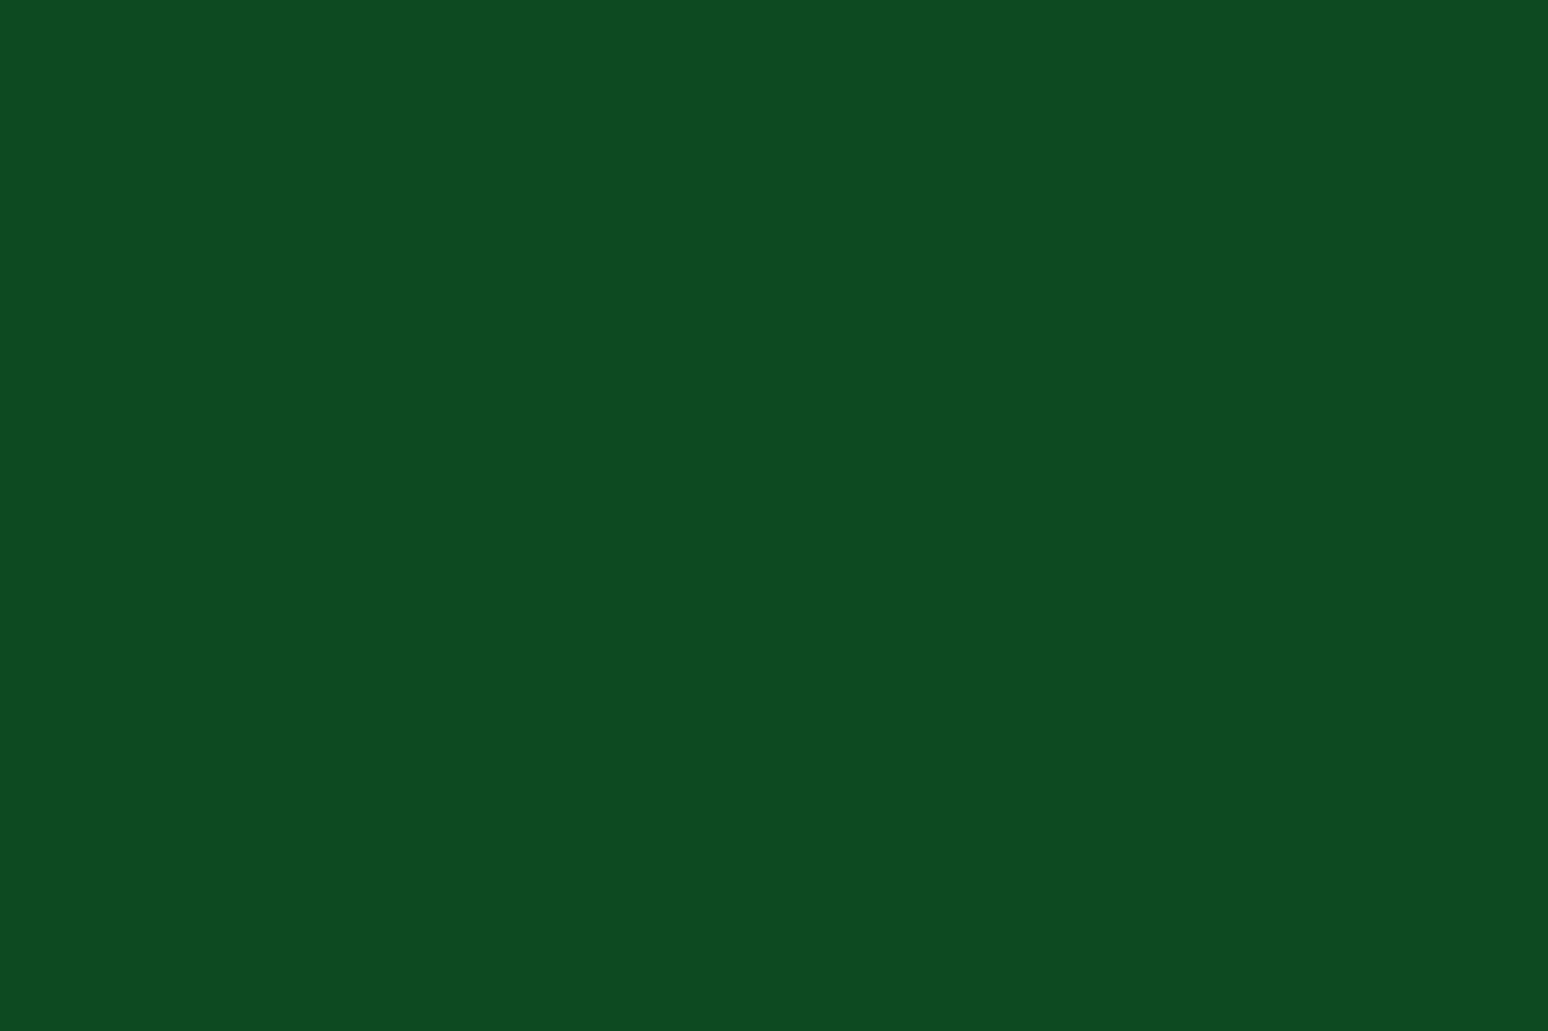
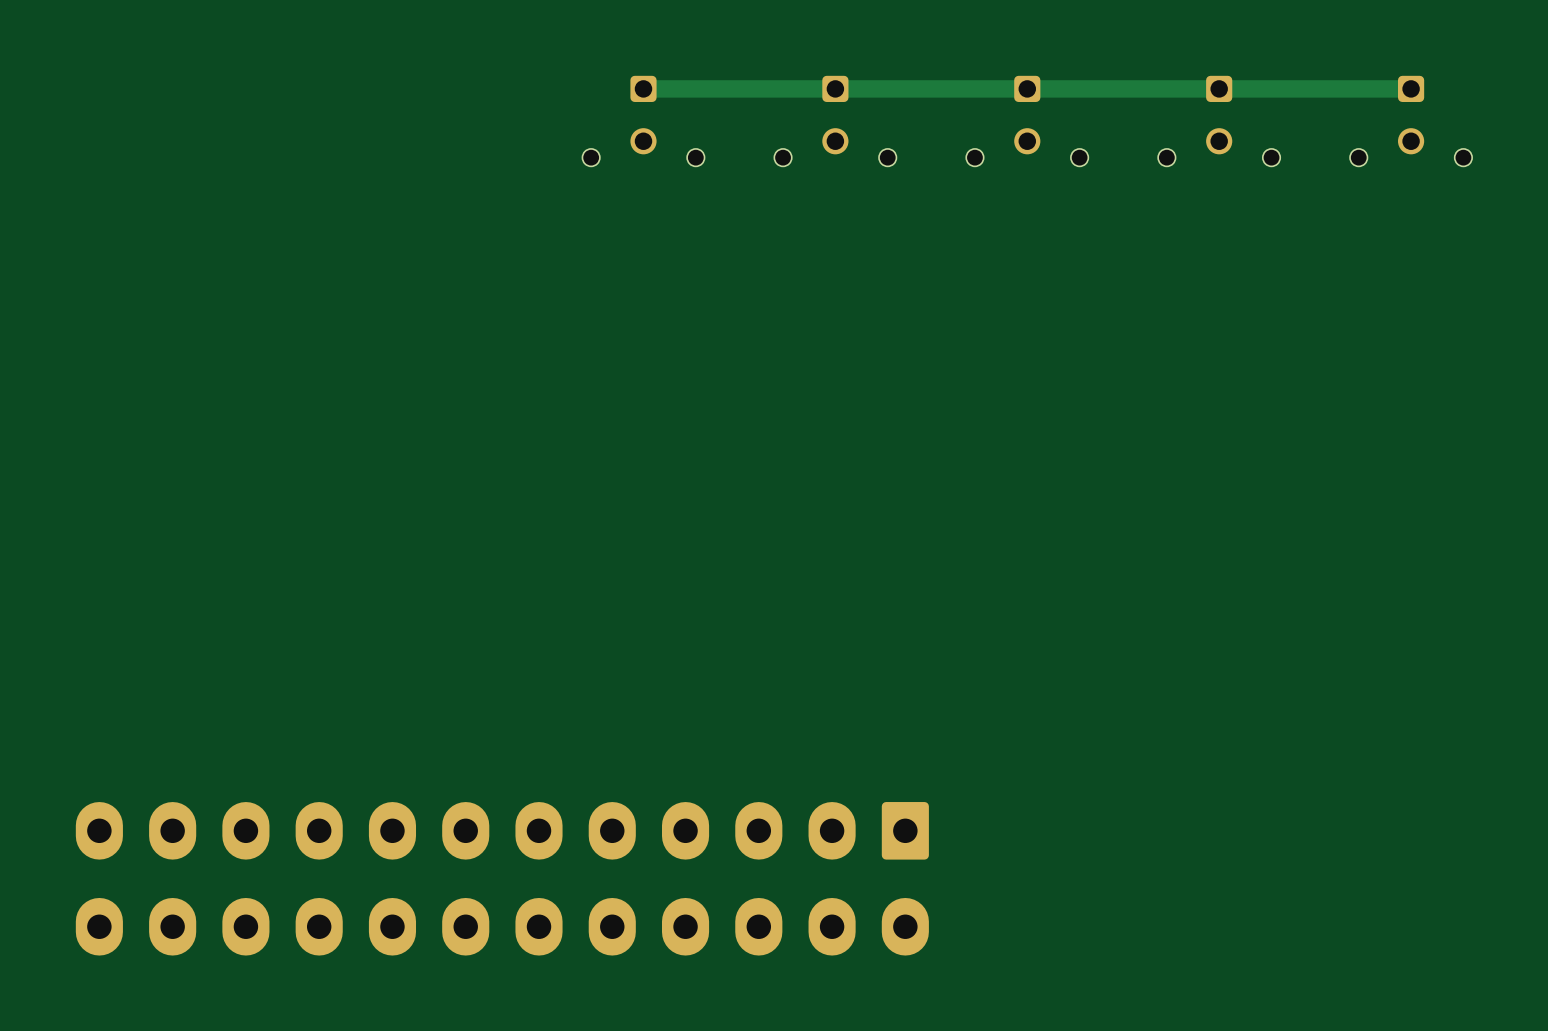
track: none -> (1411, 88) (643, 88)
part: none -> (643, 121)
part: none -> (835, 121)
part: none -> (1027, 121)
part: none -> (1219, 121)
part: none -> (1411, 121)
part: none -> (502, 878)

